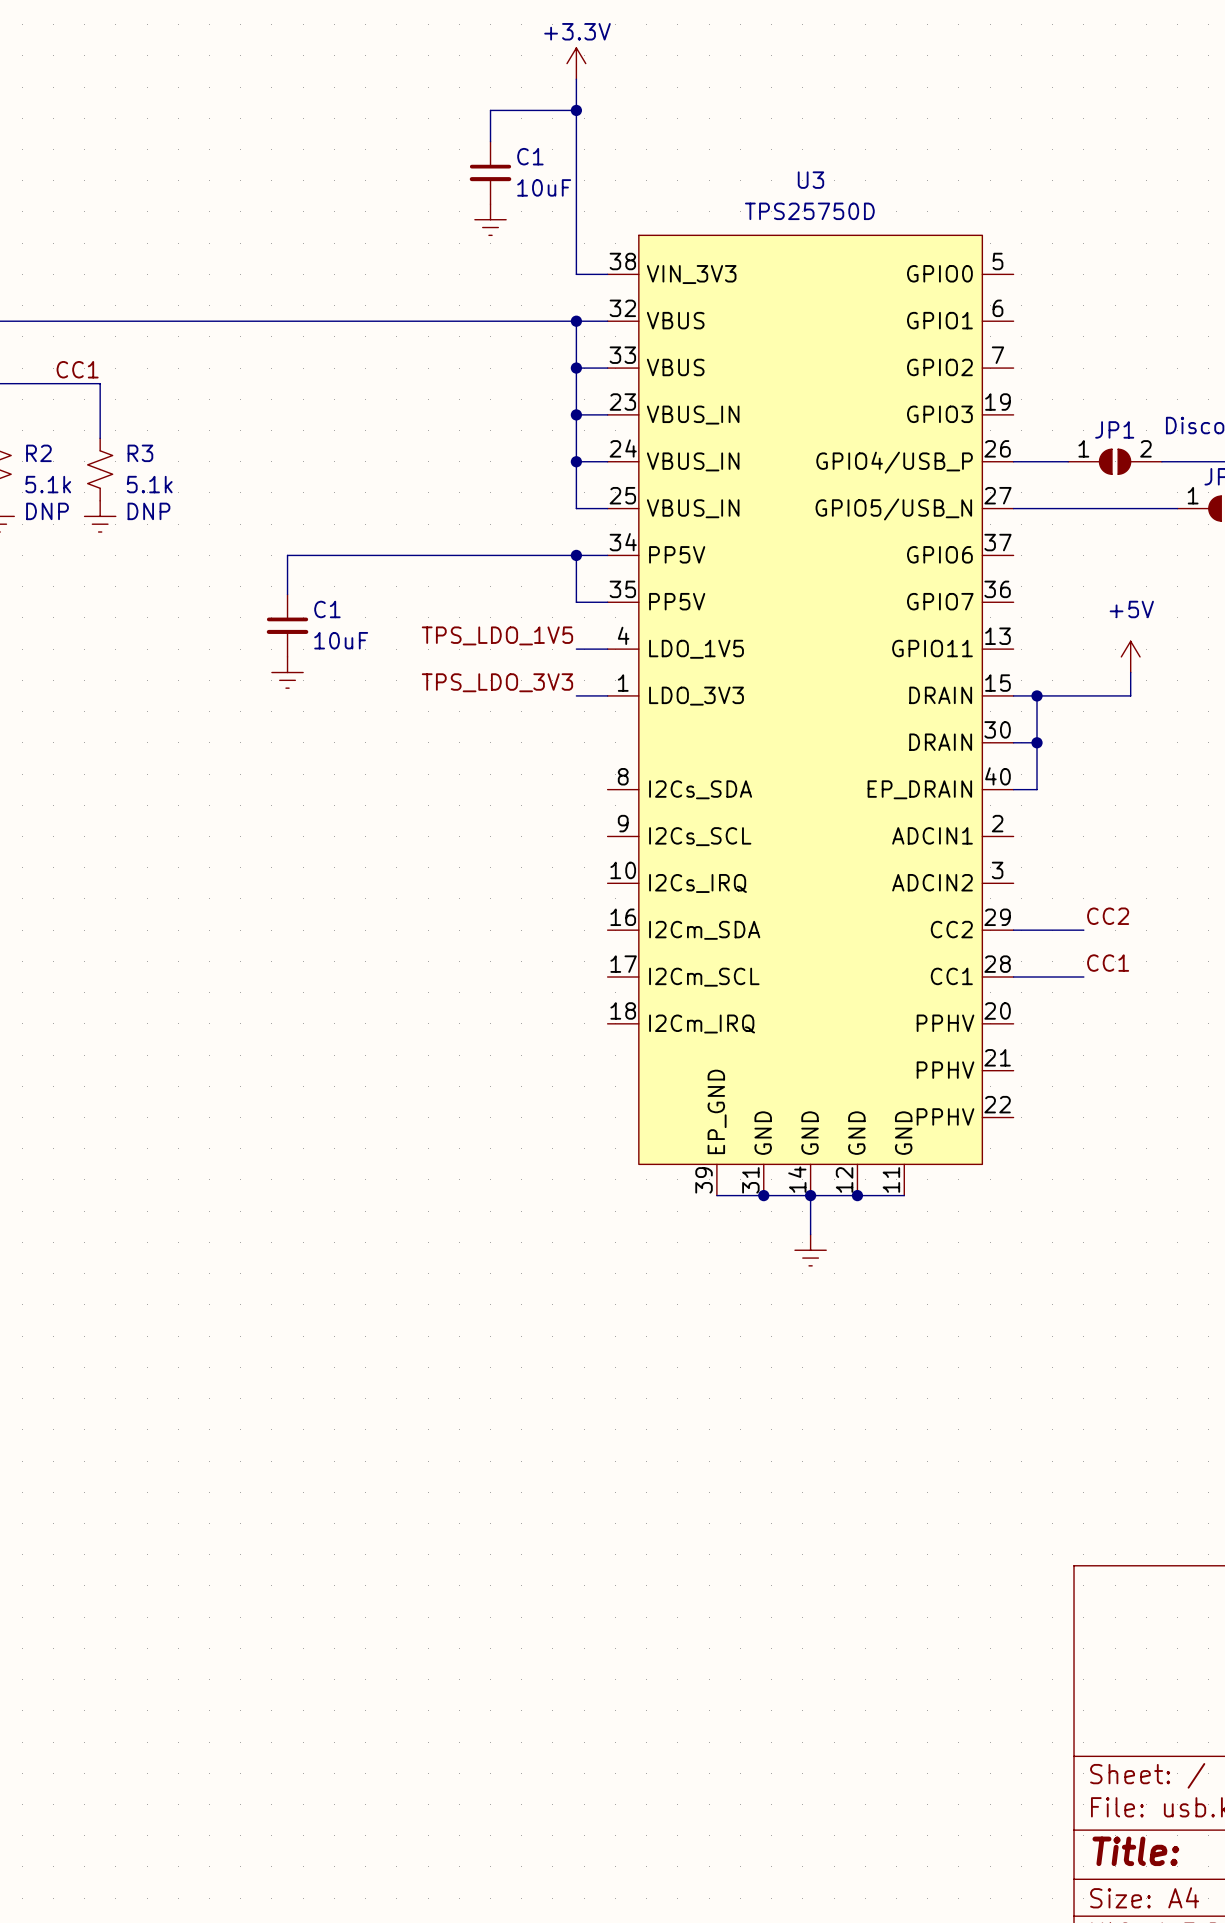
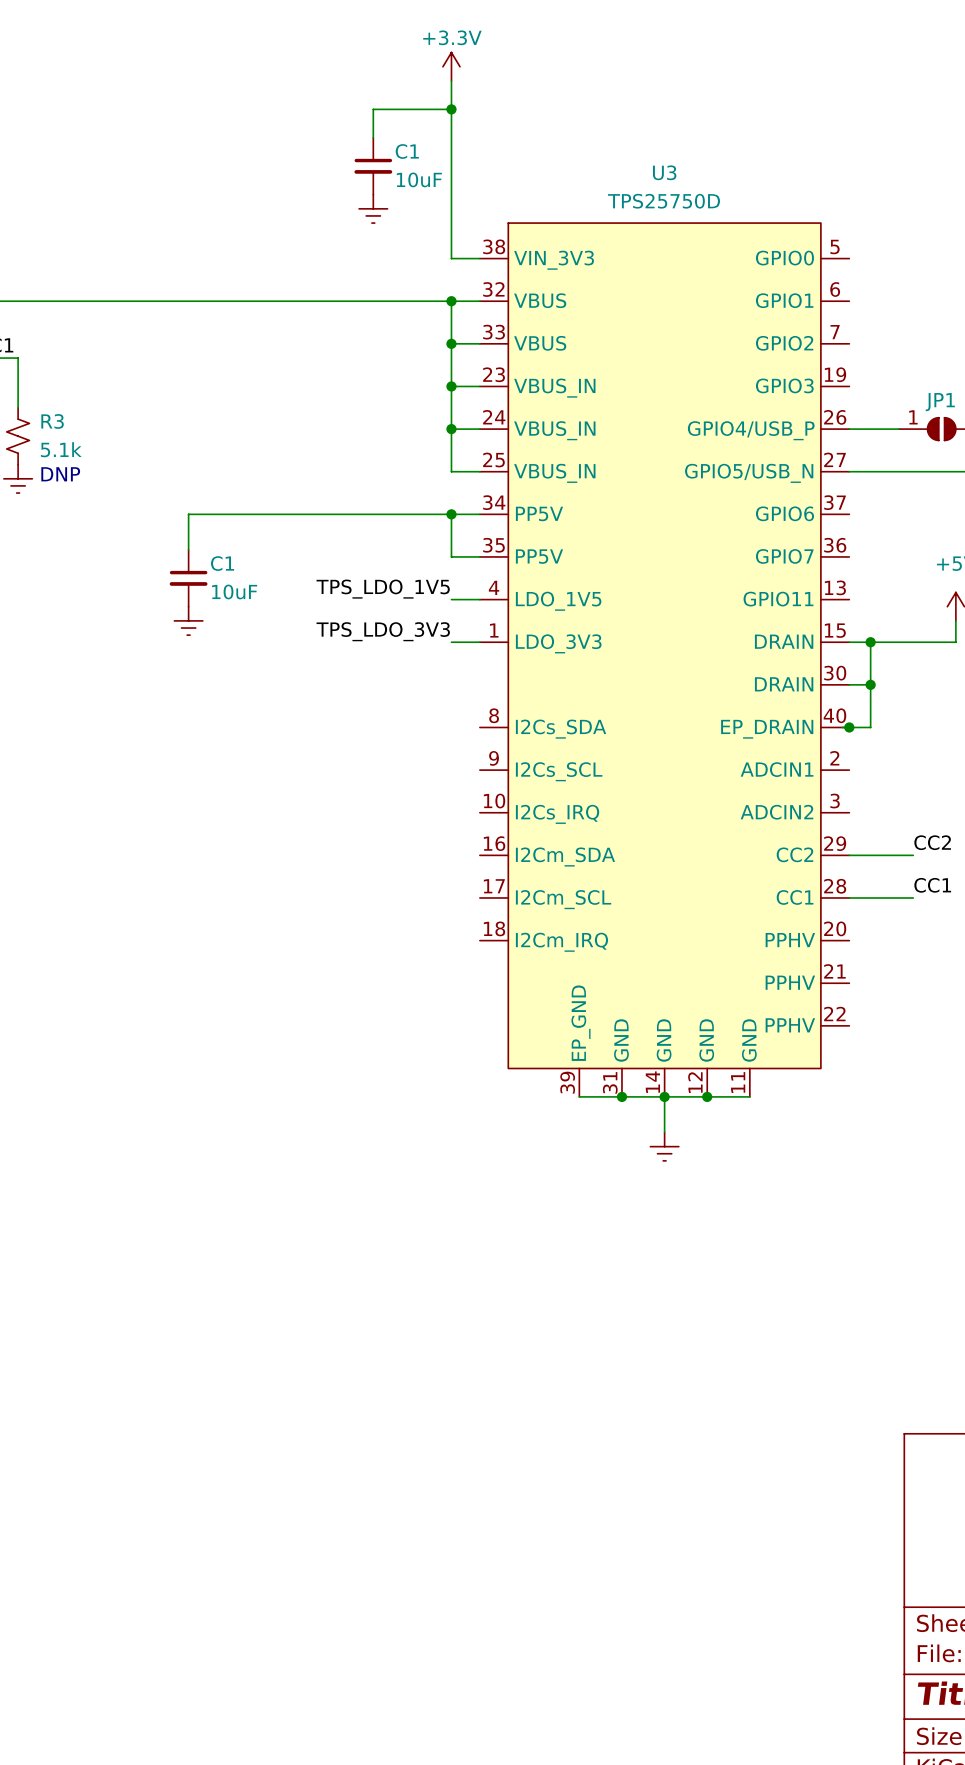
junction: none -> (849, 727)

